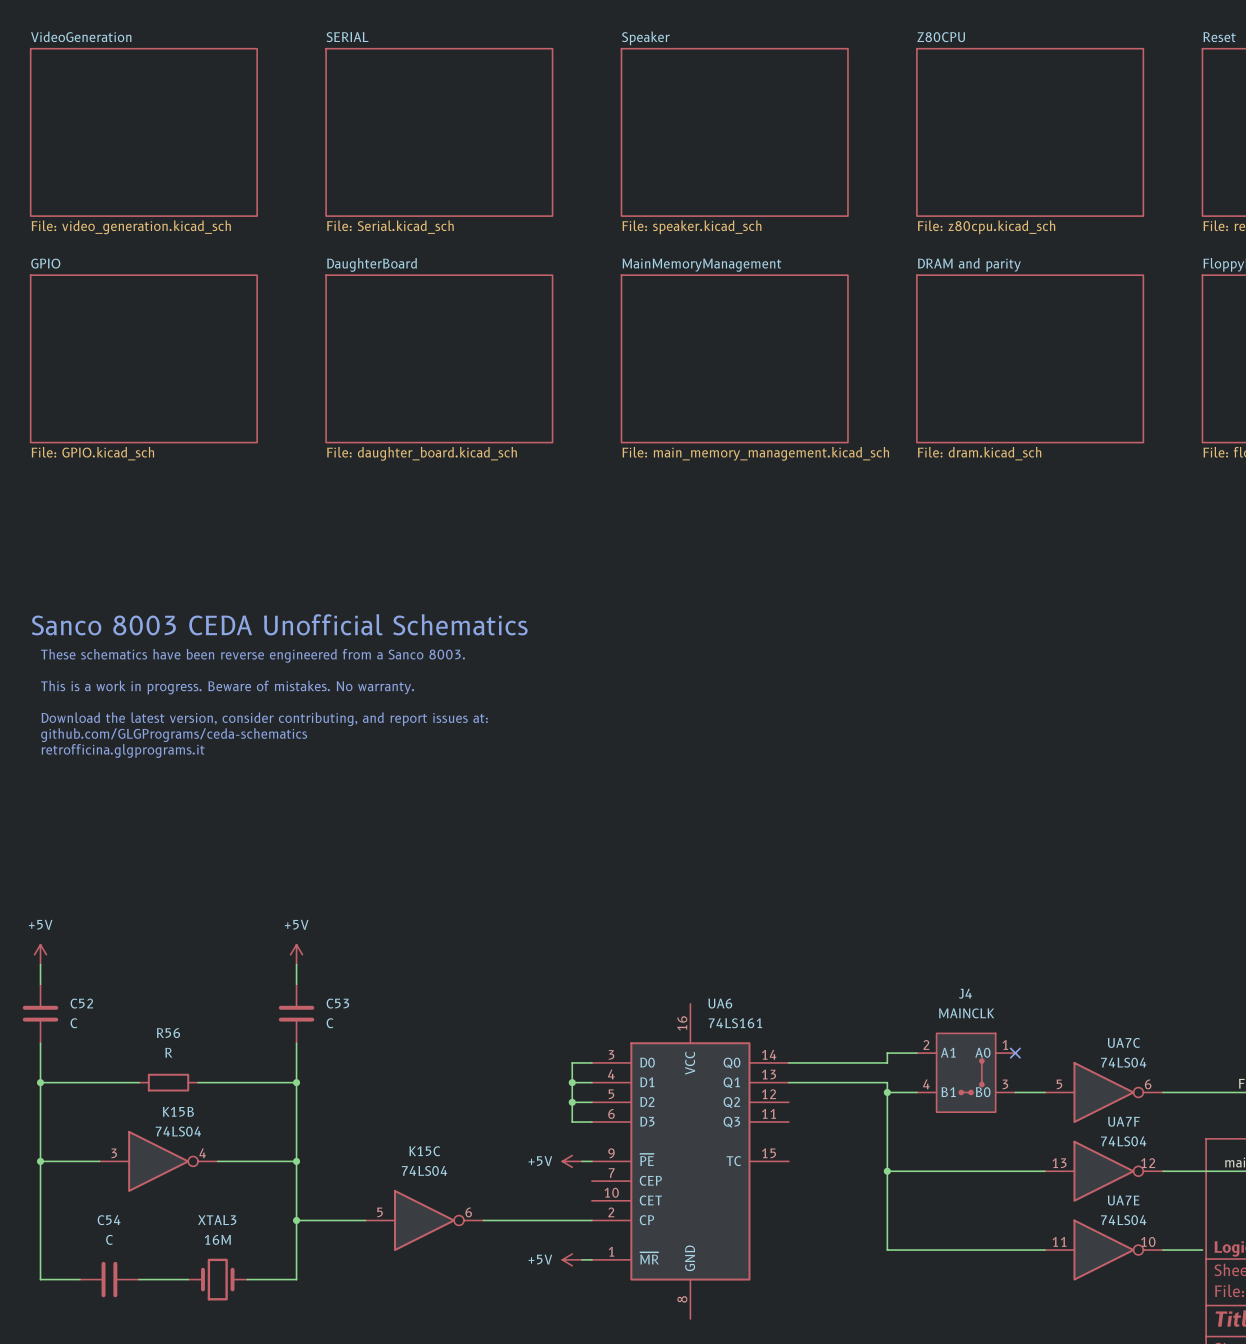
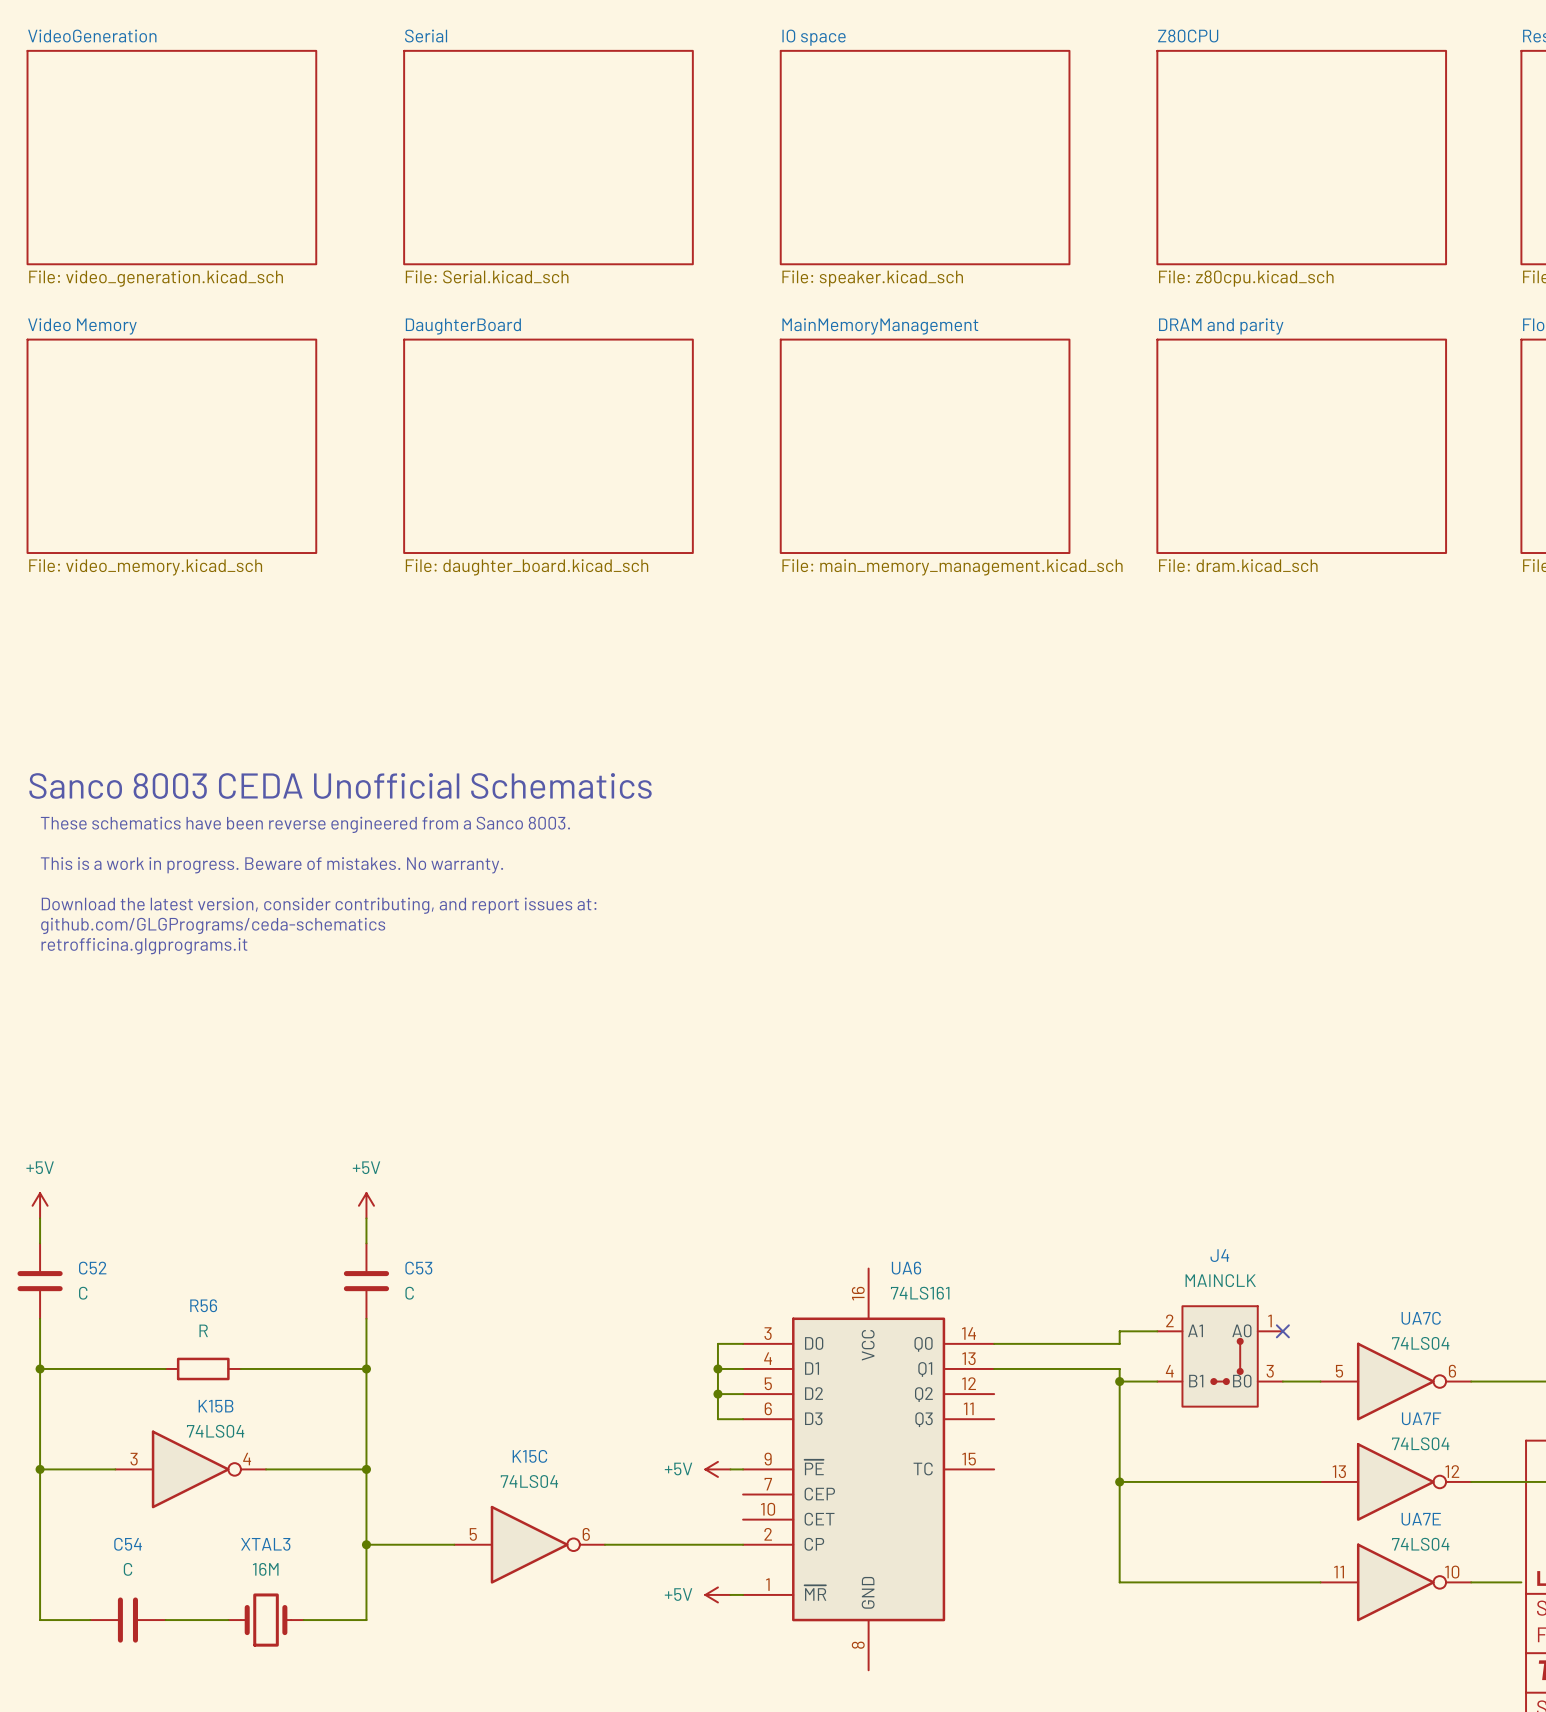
sheet SERIAL name: SERIAL (347, 37) -> Serial (426, 36)
sheet Speaker name: Speaker (645, 38) -> IO space (814, 37)
sheet GPIO name: GPIO (45, 263) -> Video Memory (82, 326)
sheet GPIO value: File: GPIO.kicad_sch (92, 453) -> File: video_memory.kicad_sch (145, 567)

